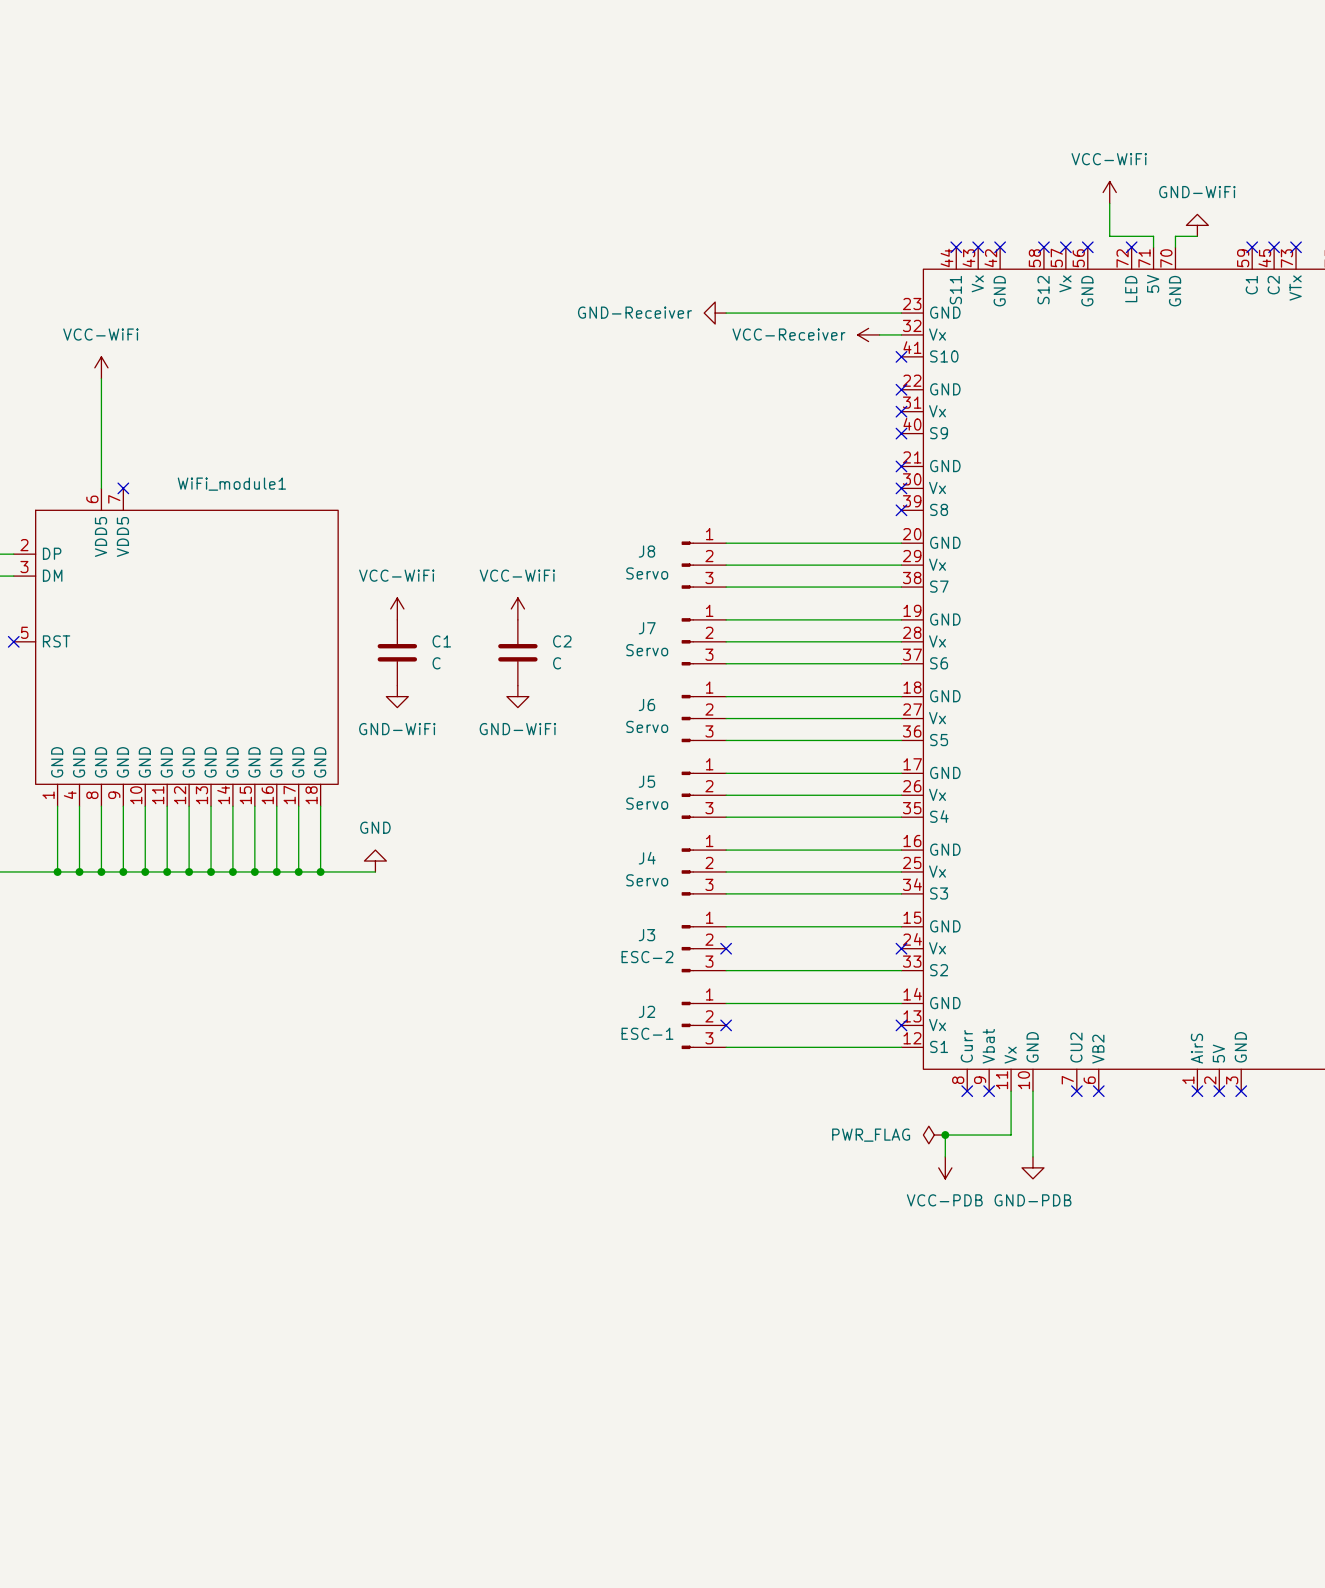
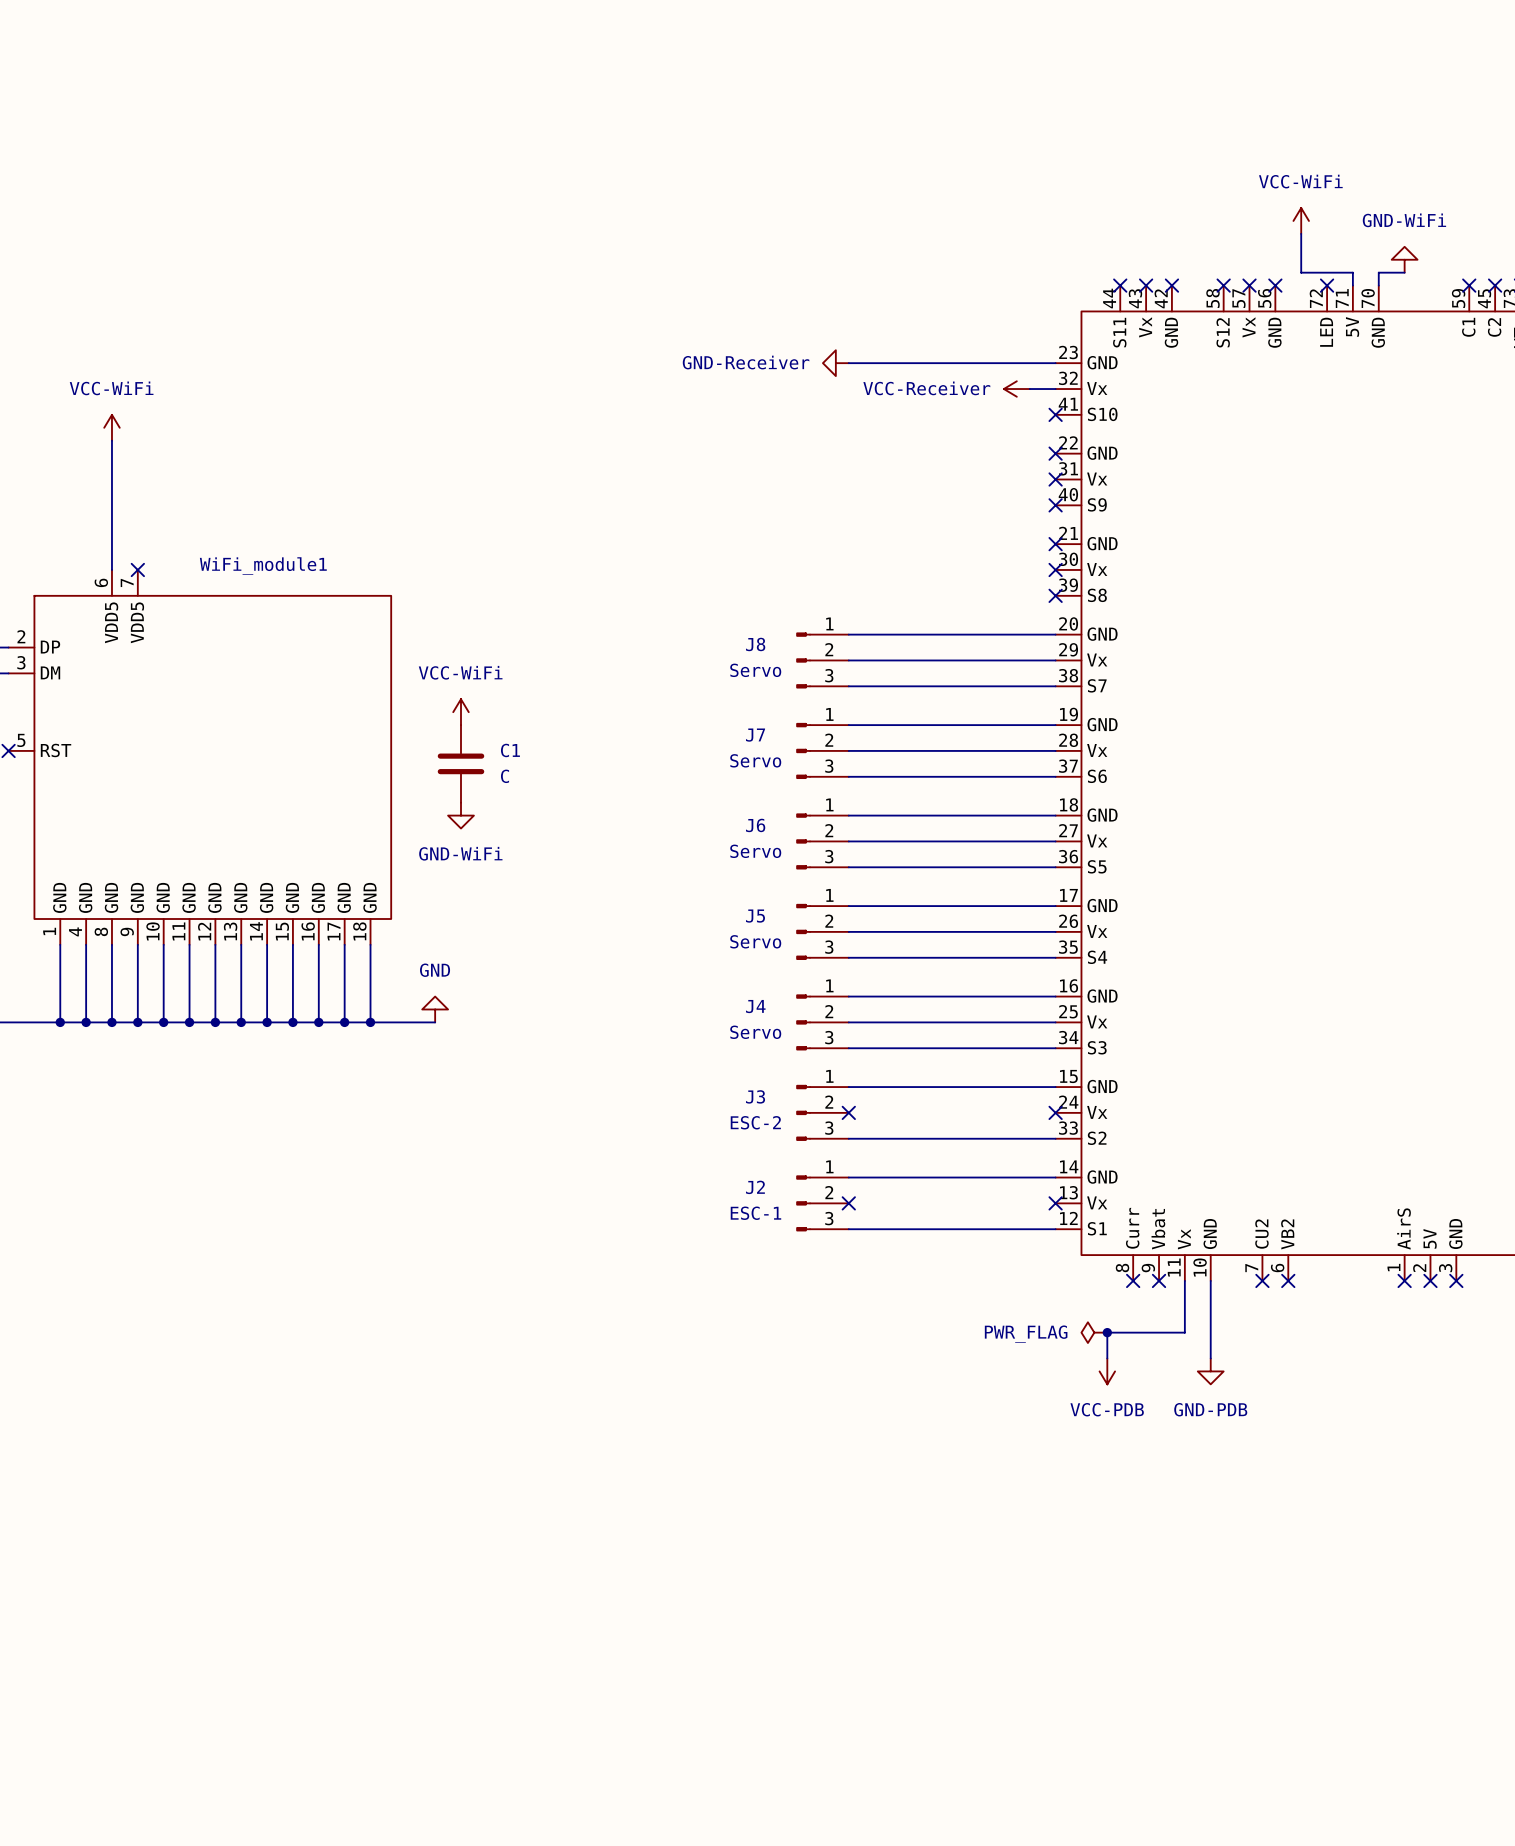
power symbol: VCC-WiFi (517, 608) -> none
C2: C (517, 652) -> none
power symbol: GND-WiFi (517, 696) -> none

